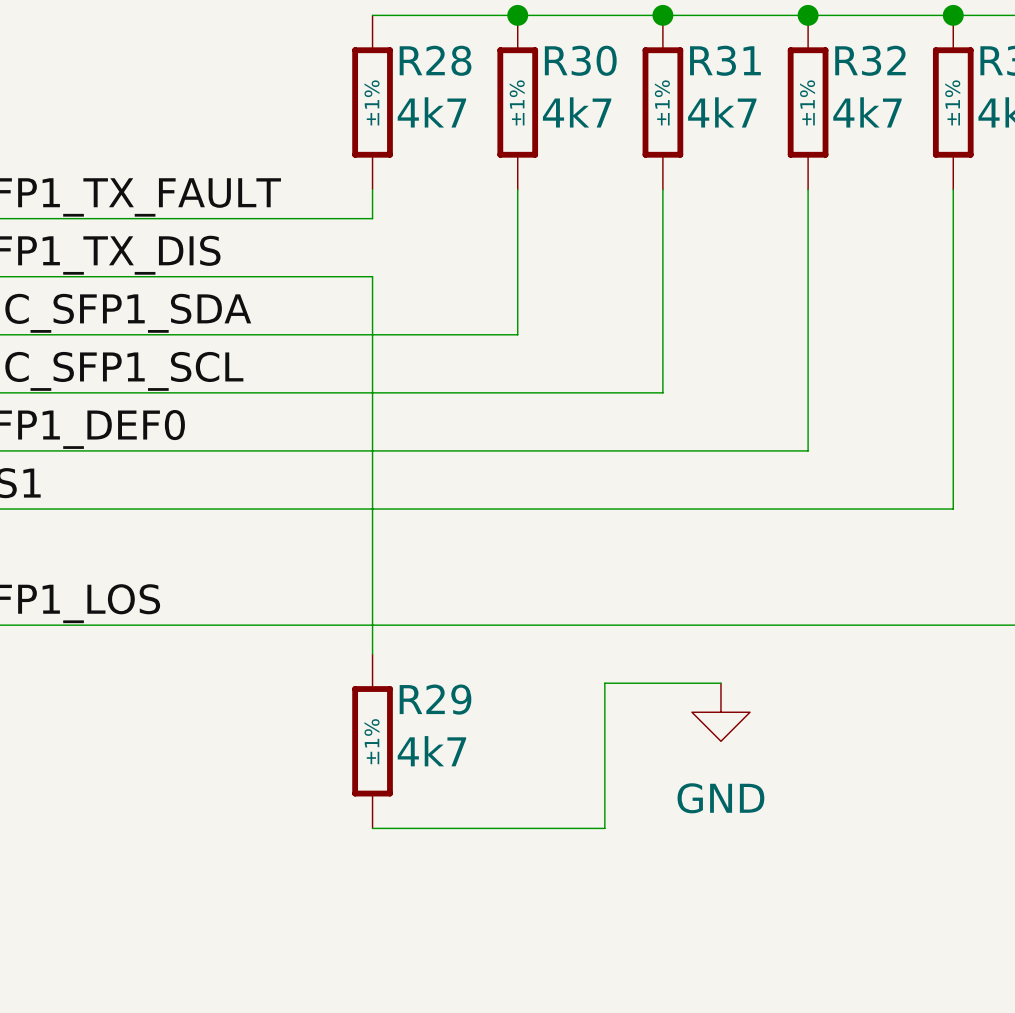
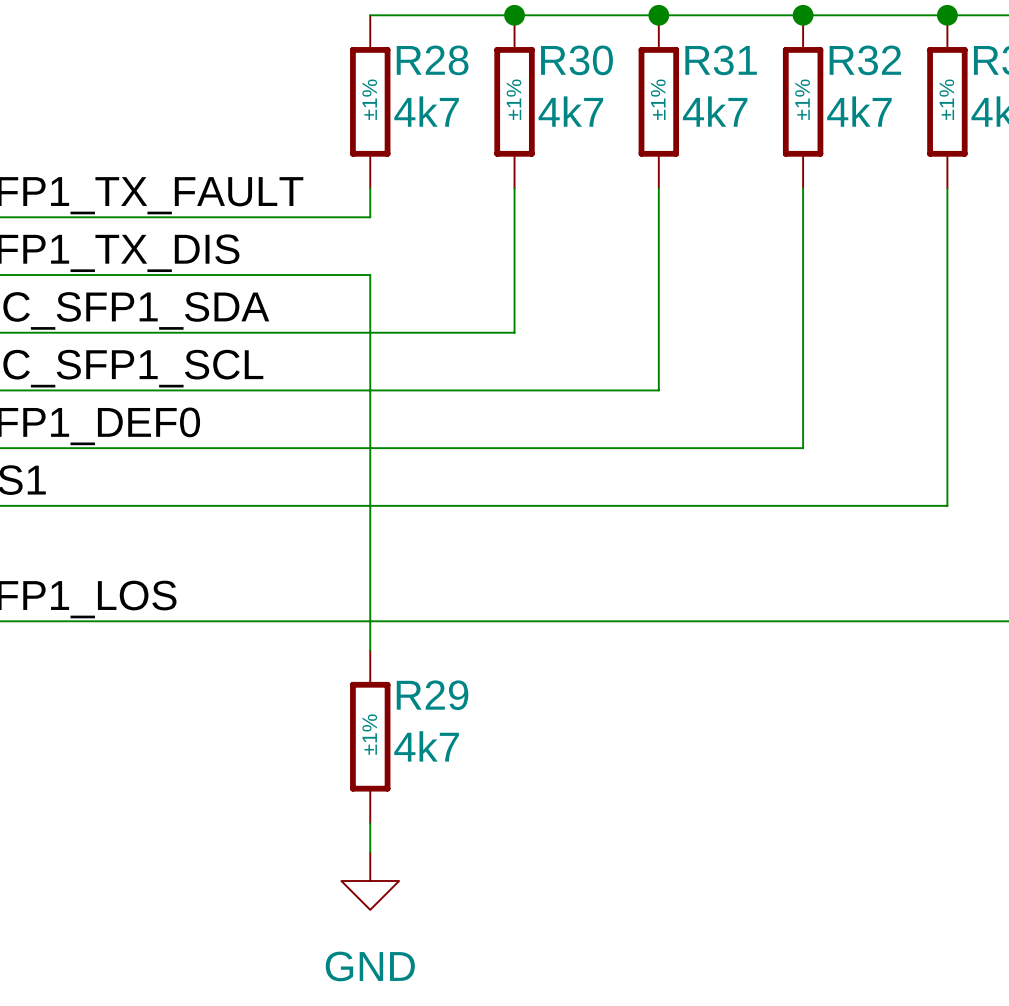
wire: (720, 683) (604, 683) (604, 828) (372, 828) -> (370, 852) (370, 823)
power symbol position: GND (720, 712) -> GND (370, 881)

